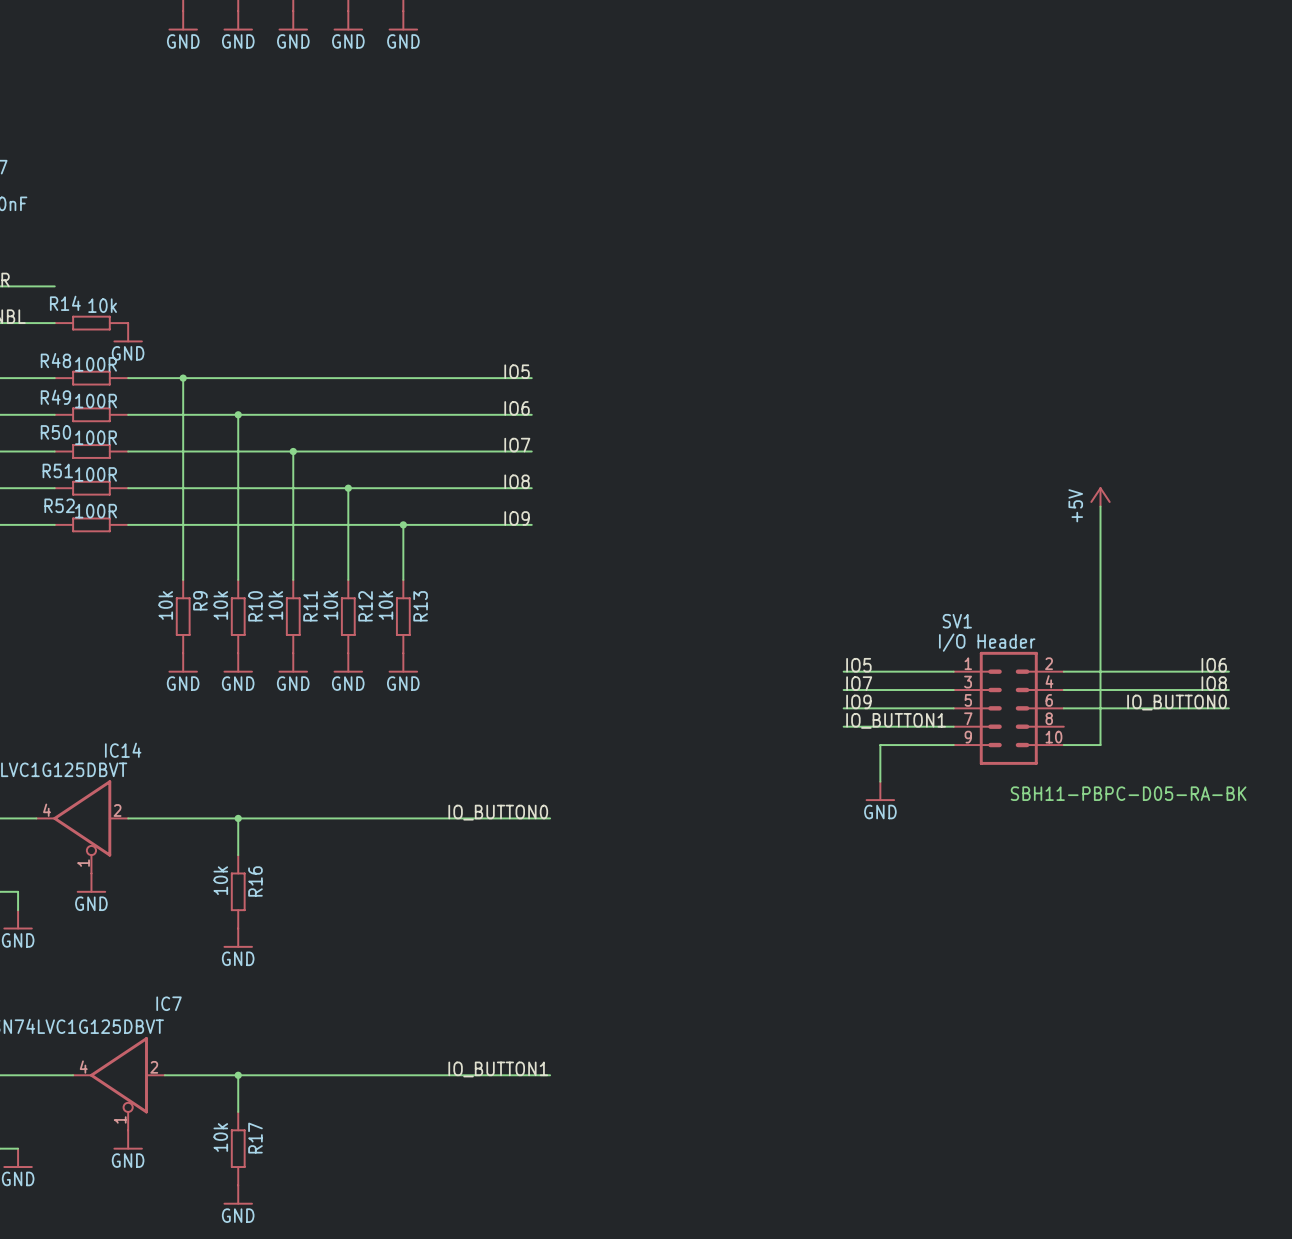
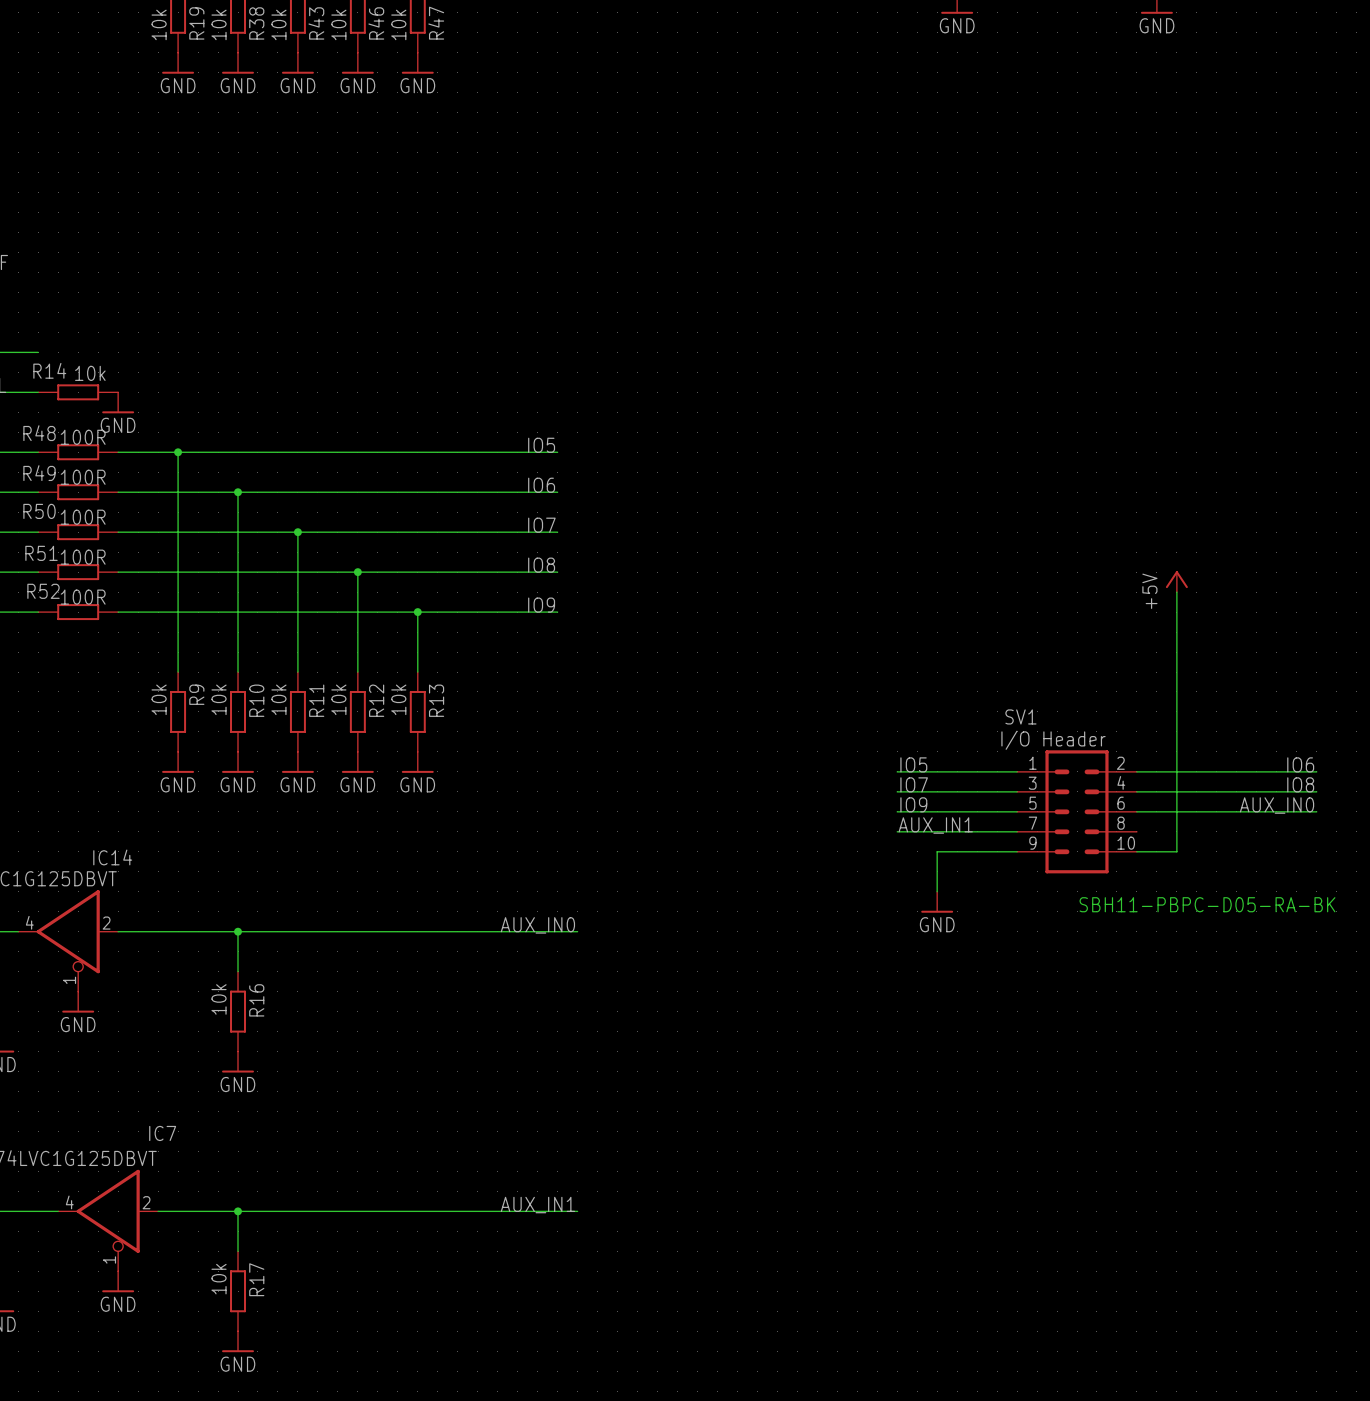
label: IO_BUTTON0 (1177, 702) -> AUX_IN0 (1277, 805)
label: IO_BUTTON1 (896, 720) -> AUX_IN1 (935, 825)
label: IO_BUTTON0 (498, 812) -> AUX_IN0 (537, 925)
label: IO_BUTTON1 (498, 1069) -> AUX_IN1 (537, 1205)

